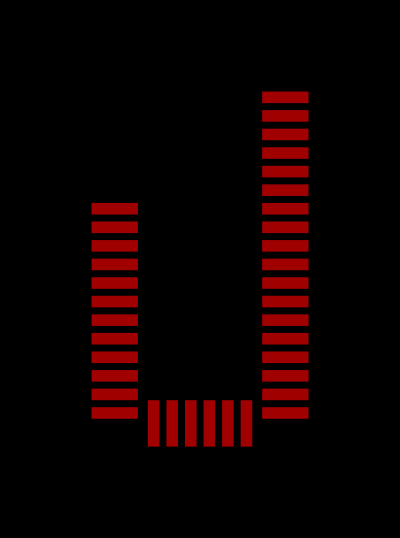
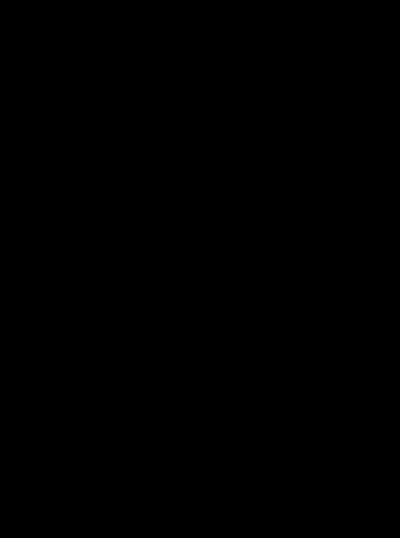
part: (200, 269) -> none

